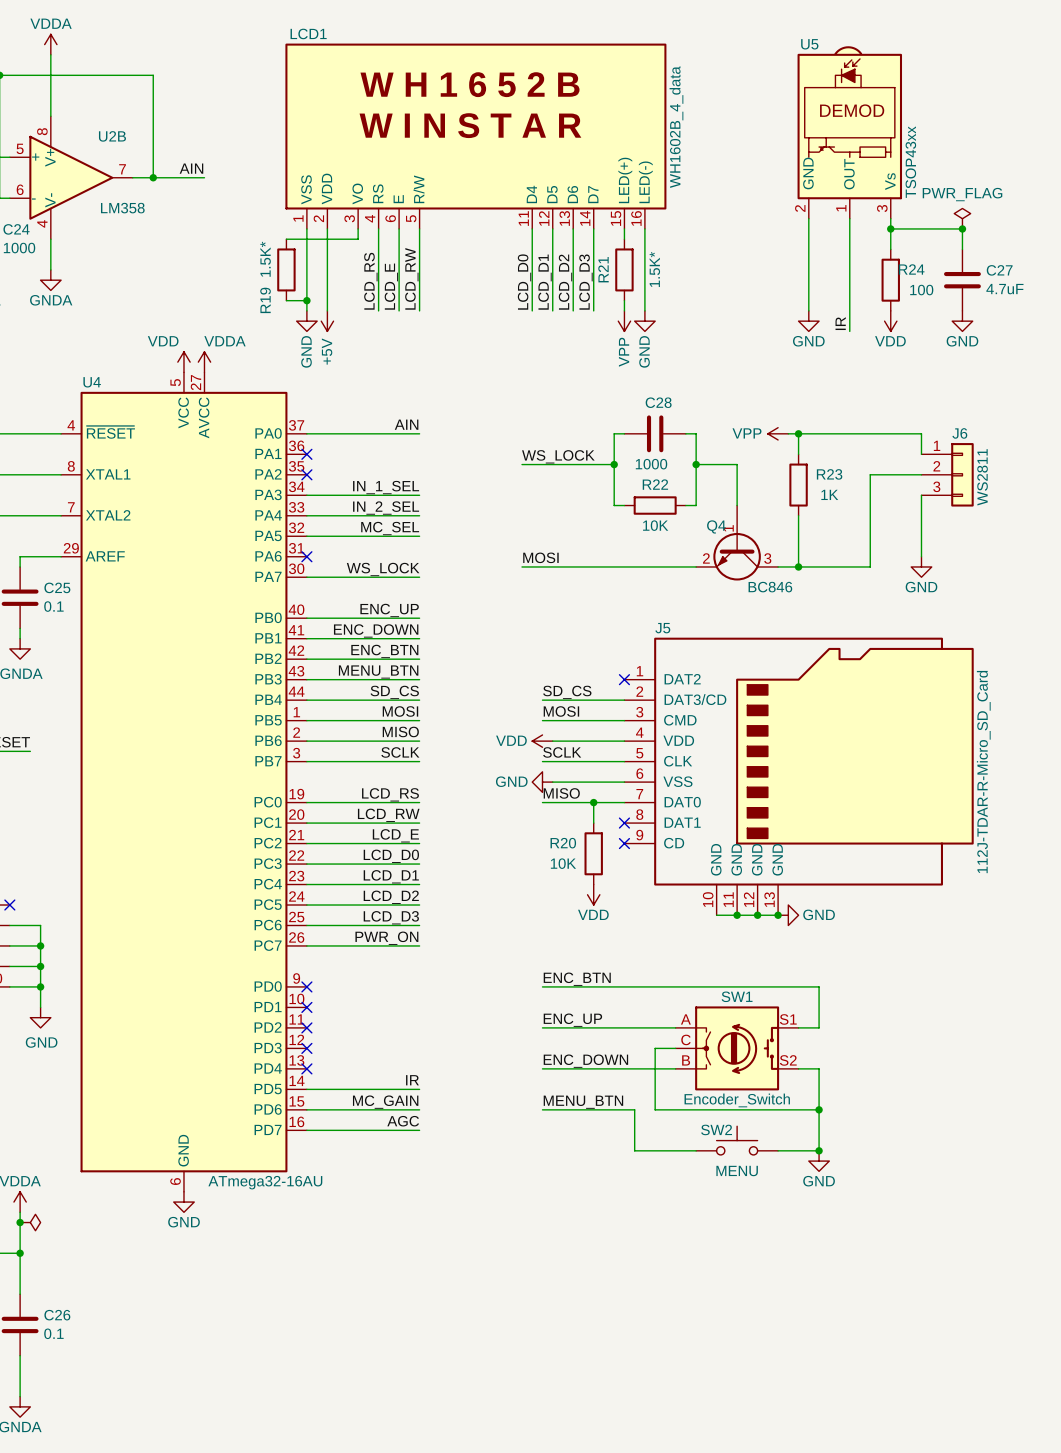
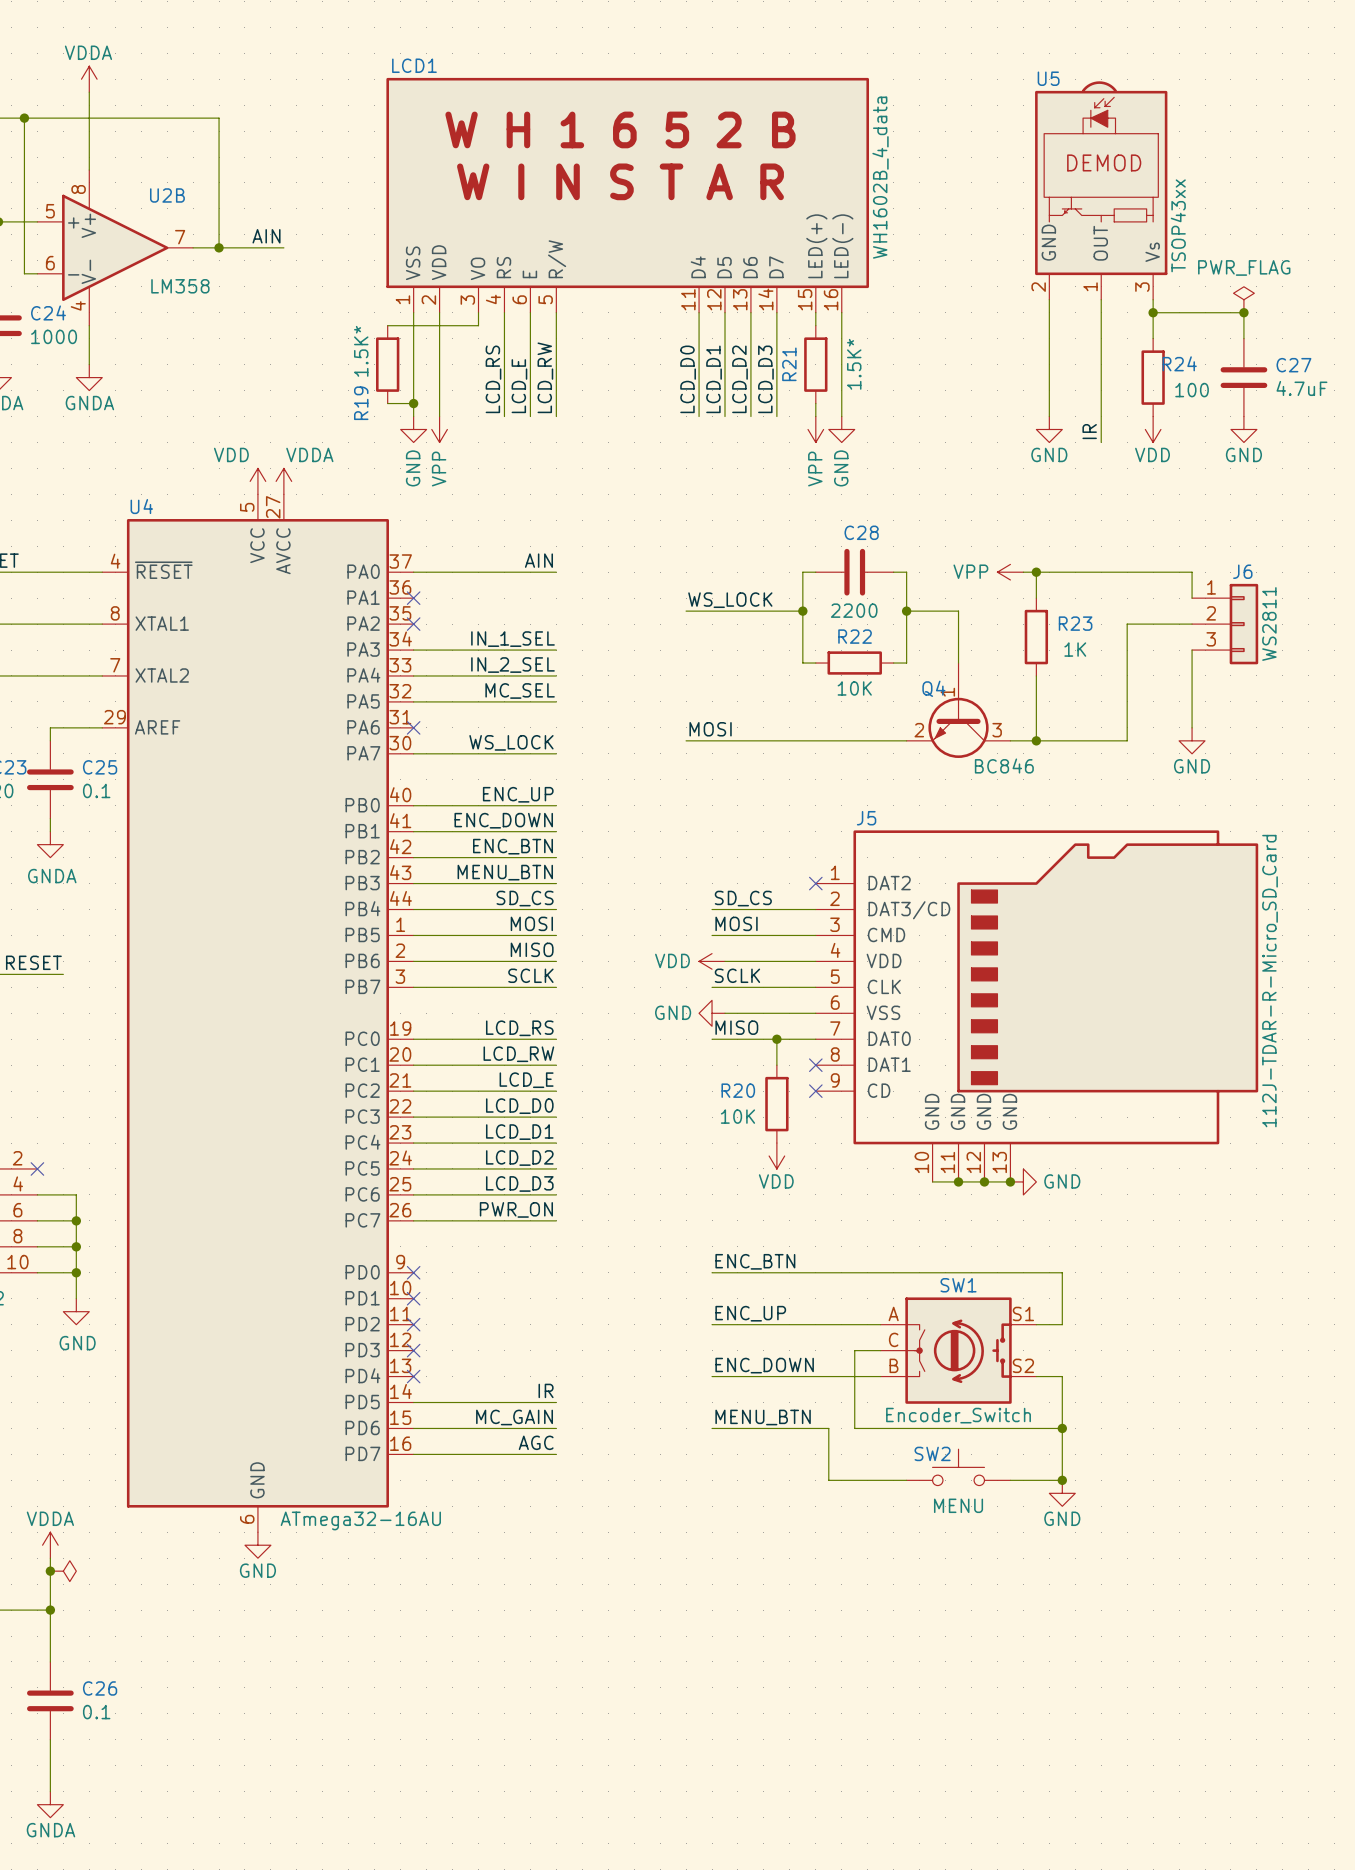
power symbol: +5V (327, 321) -> VPP (439, 429)
C28 value: 1000 (651, 464) -> 2200 (854, 610)

